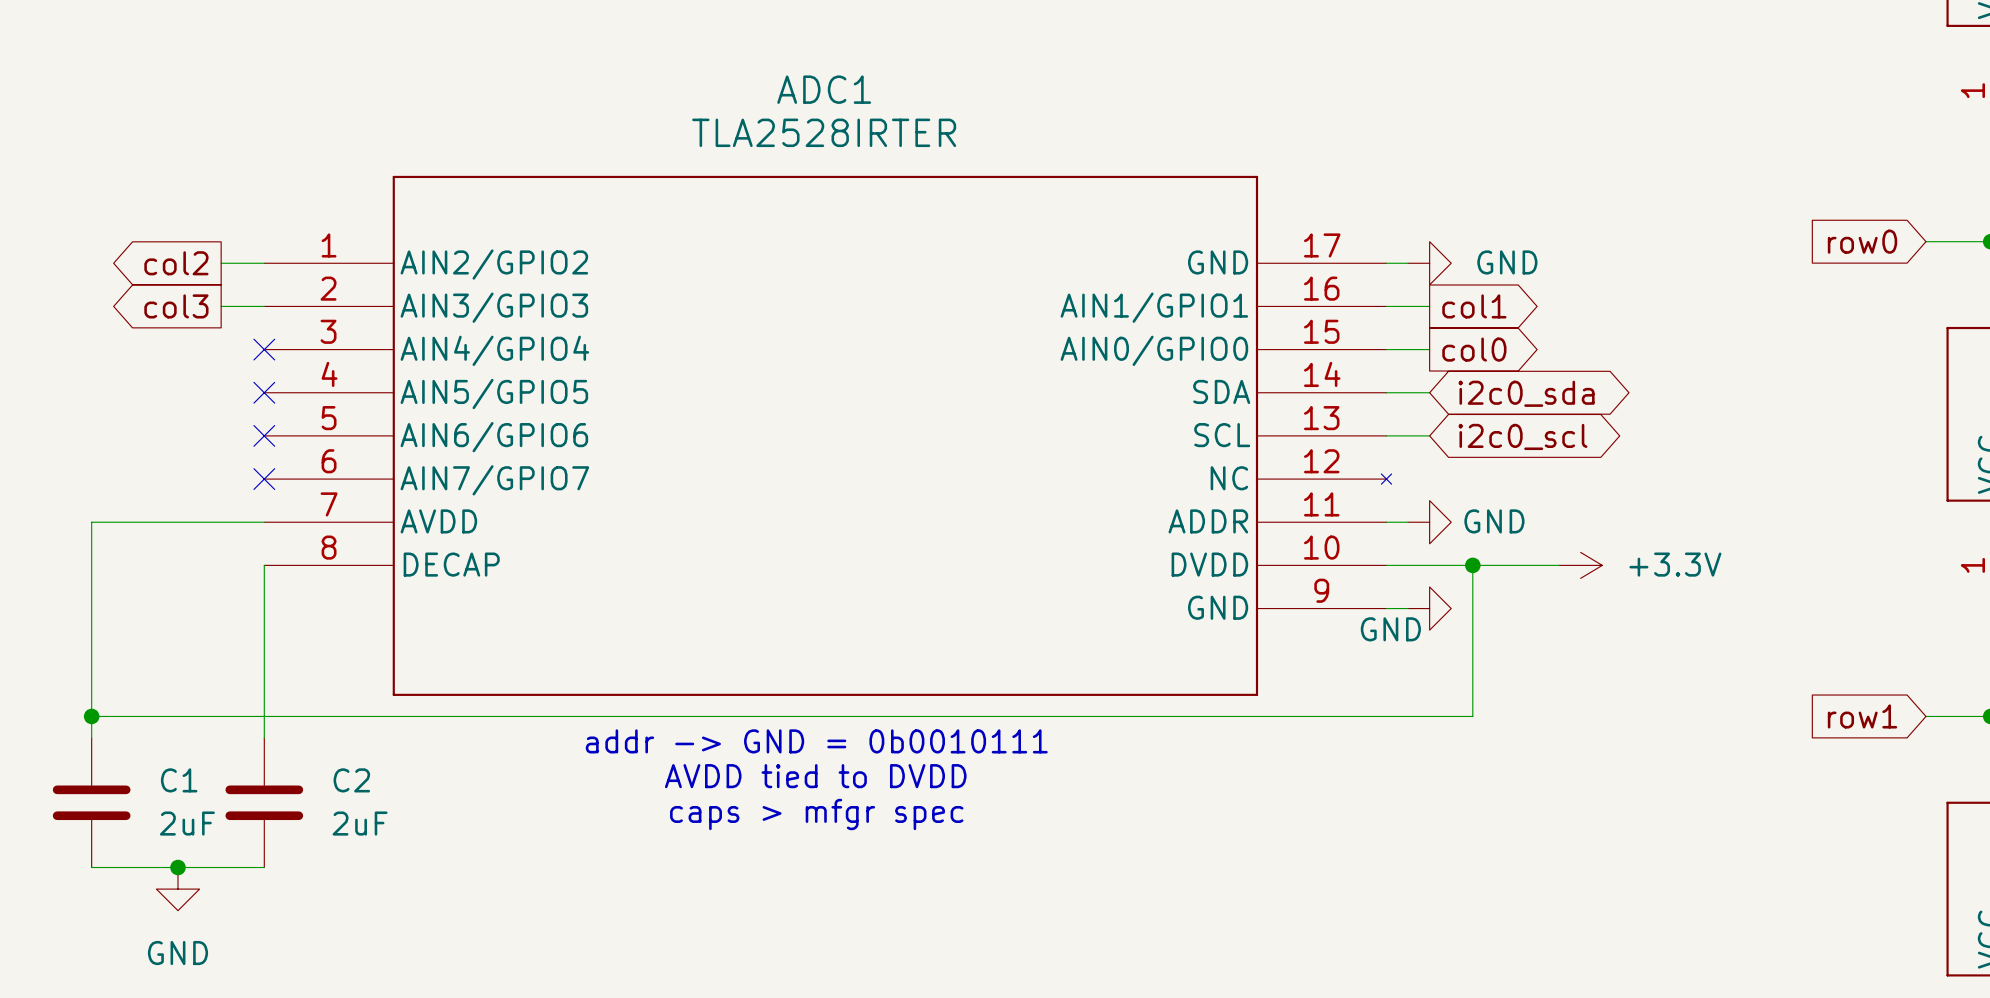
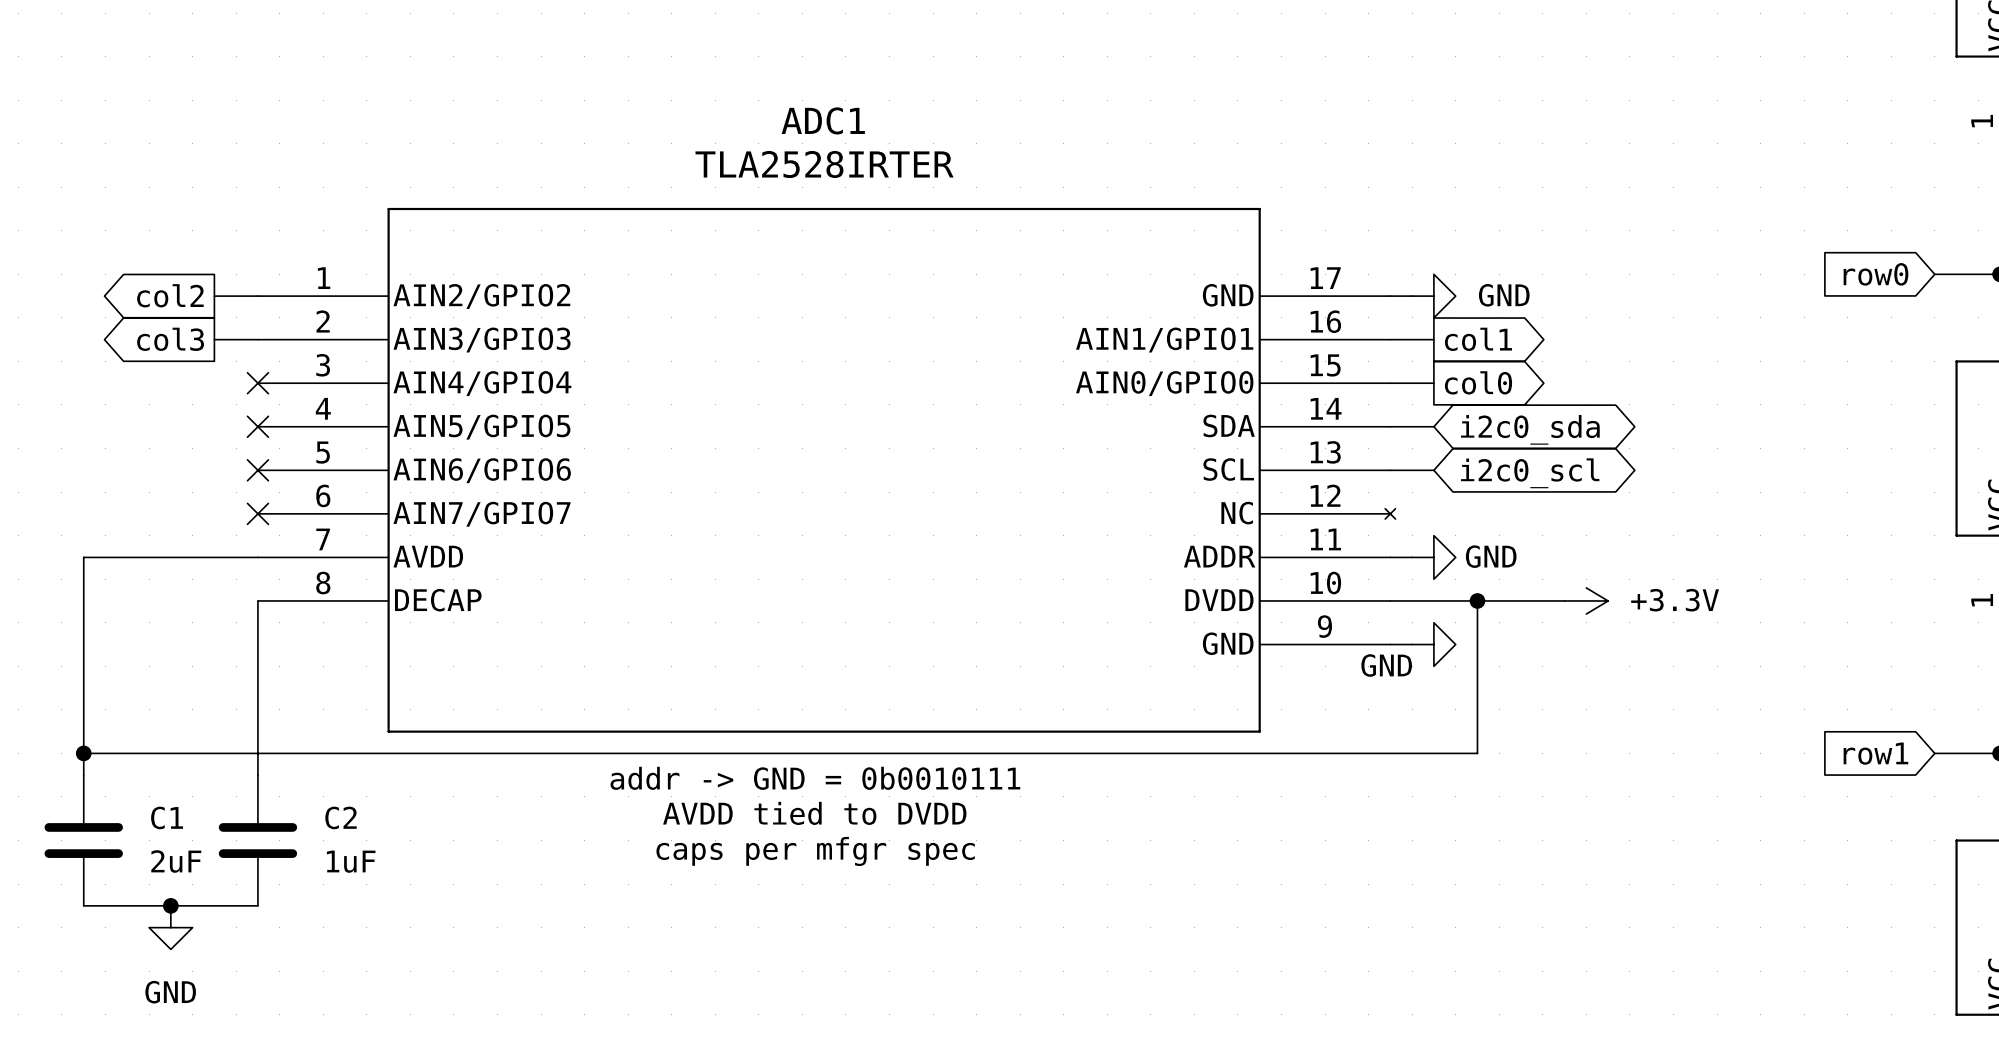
text: caps > mfgr spec (816, 814) -> caps per mfgr spec (815, 851)
C2 value: 2uF (360, 823) -> 1uF (351, 861)

